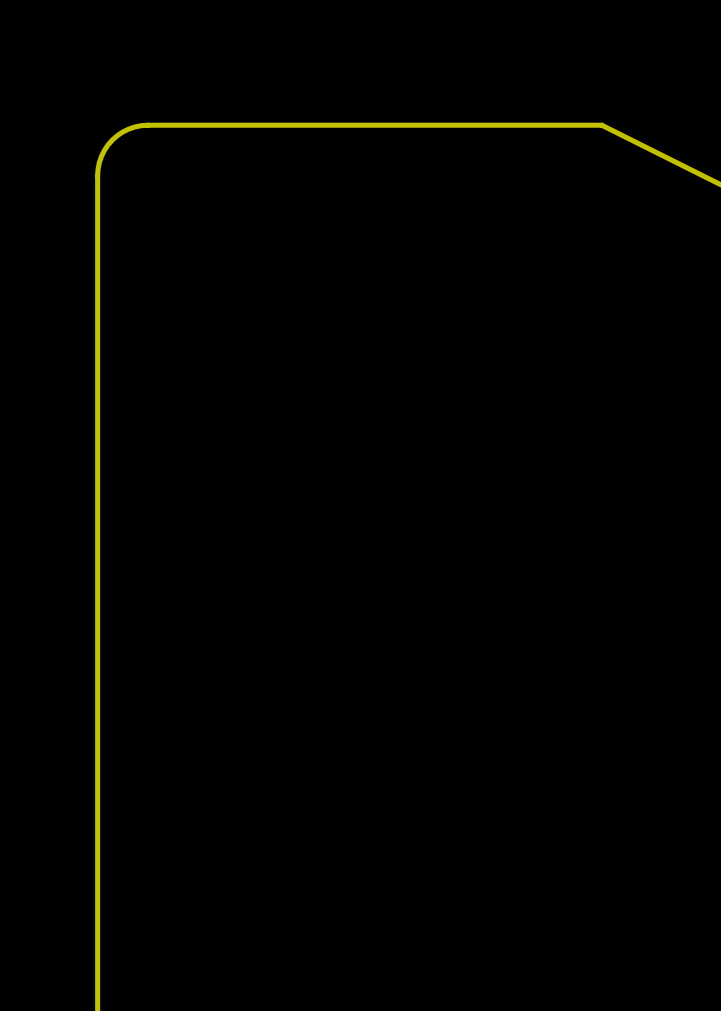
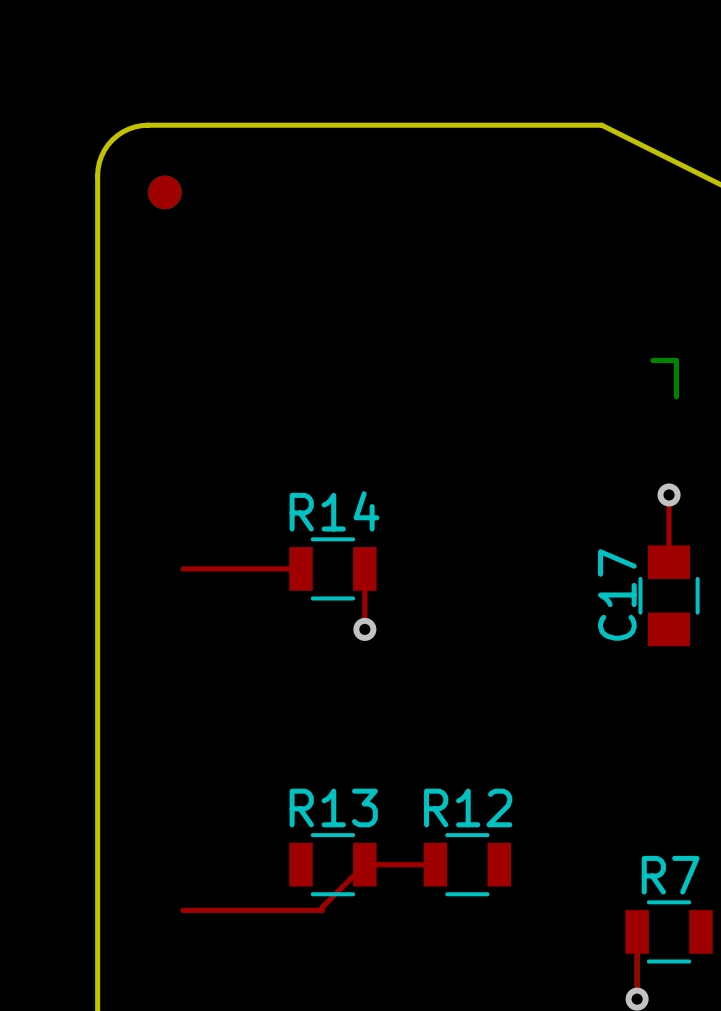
part: none -> (164, 192)
bottom track: none -> (652, 360) (676, 360) (676, 396)
top track: none -> (669, 494) (669, 562)
via: none -> (669, 494)
top track: none -> (183, 568) (300, 568)
R14: none -> (332, 568)
top track: none -> (364, 568) (364, 629)
C17: none -> (669, 595)
via: none -> (364, 629)
R13: none -> (332, 864)
top track: none -> (435, 864) (364, 864) (322, 907) (322, 910) (183, 910)
R12: none -> (467, 864)
top track: none -> (637, 931) (637, 999)
R7: none -> (669, 931)
via: none -> (637, 999)

